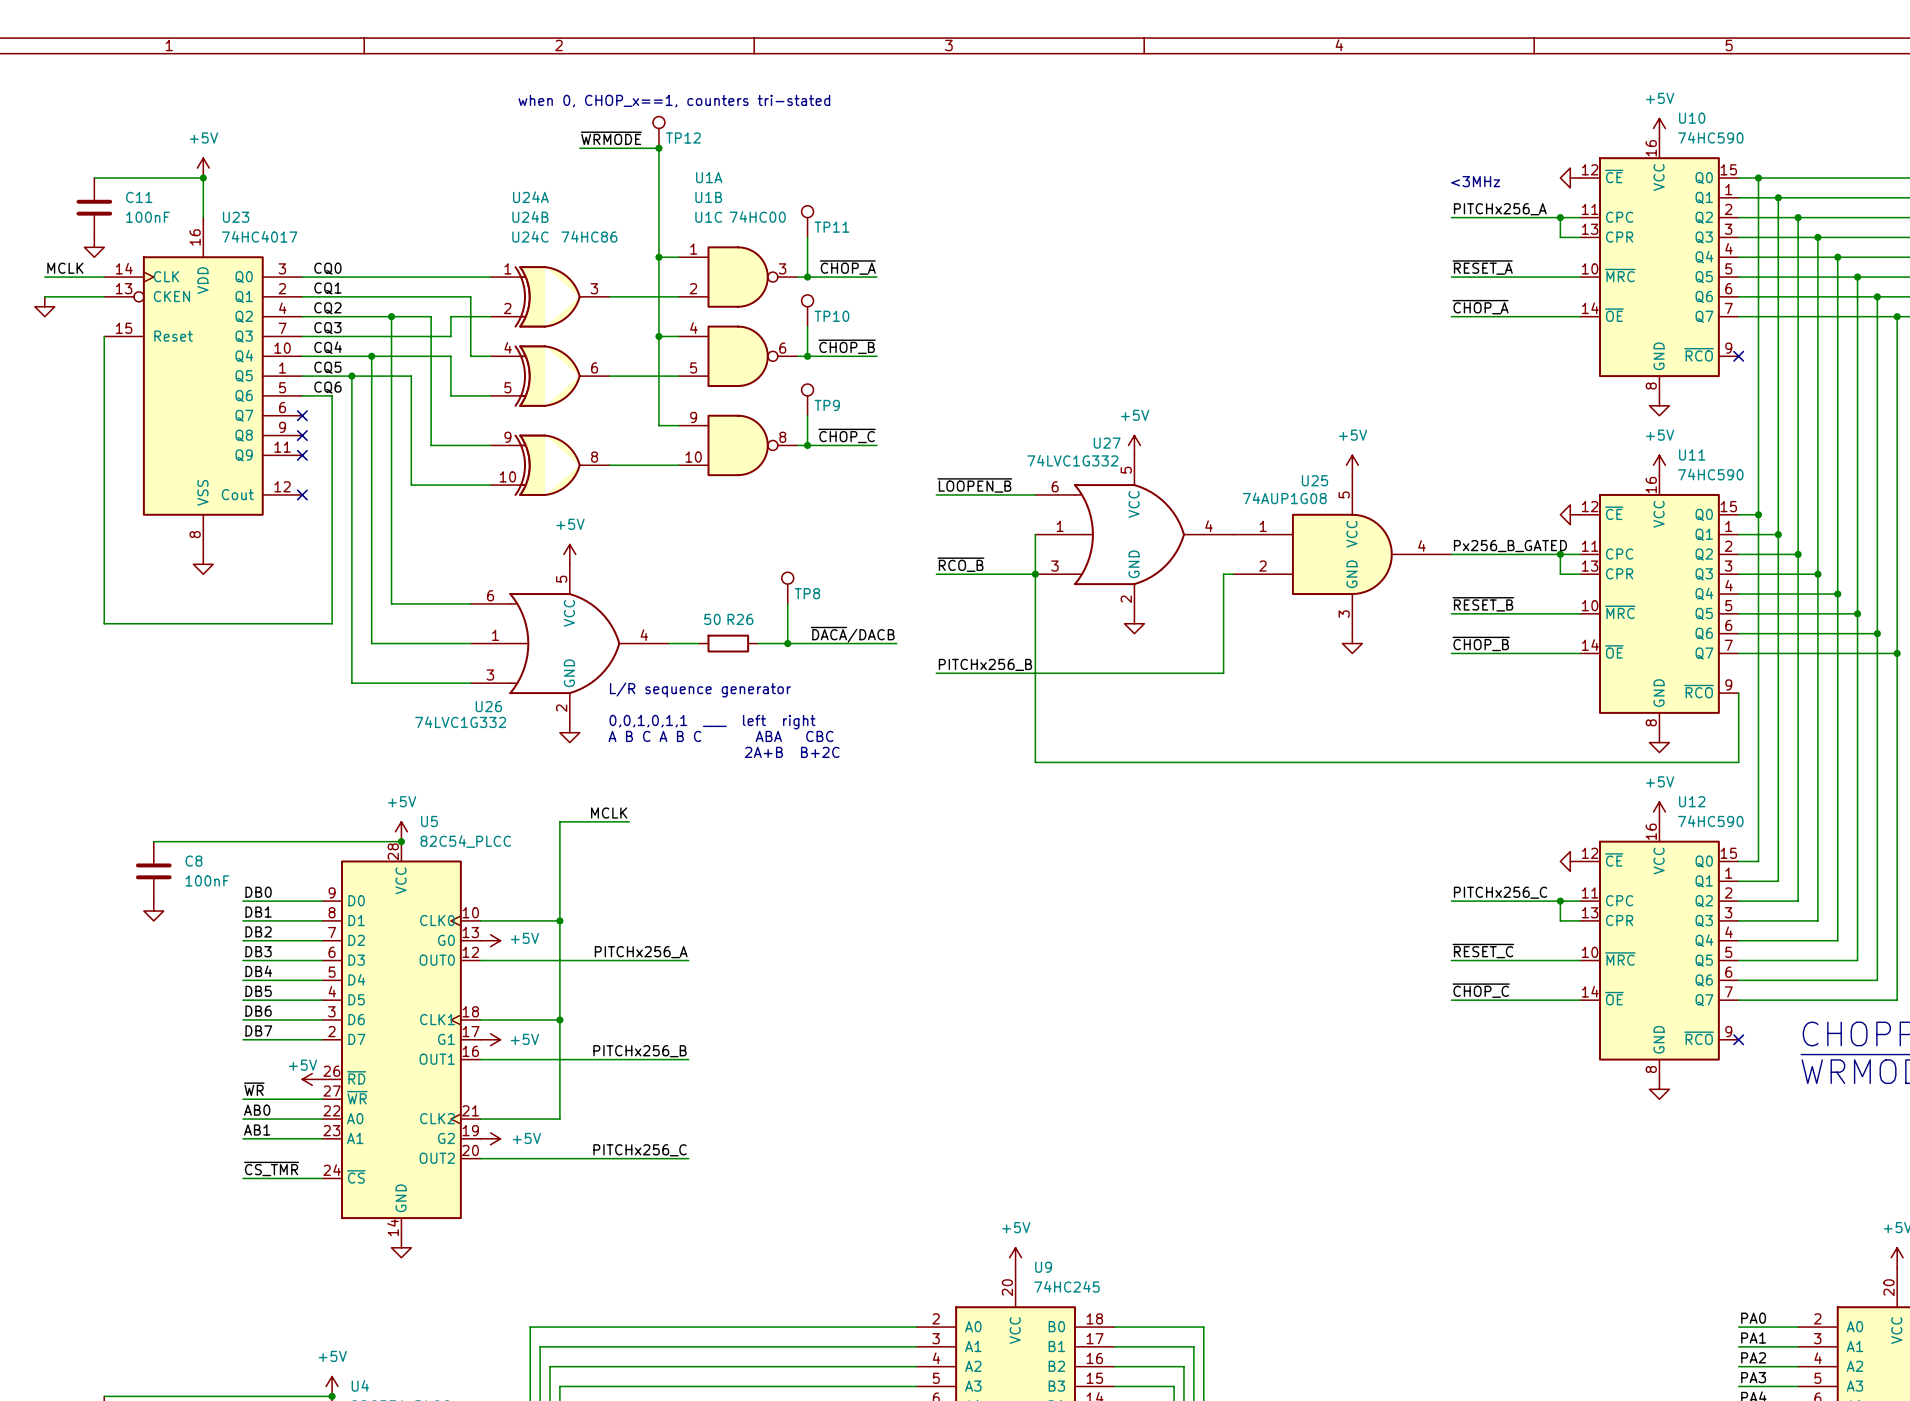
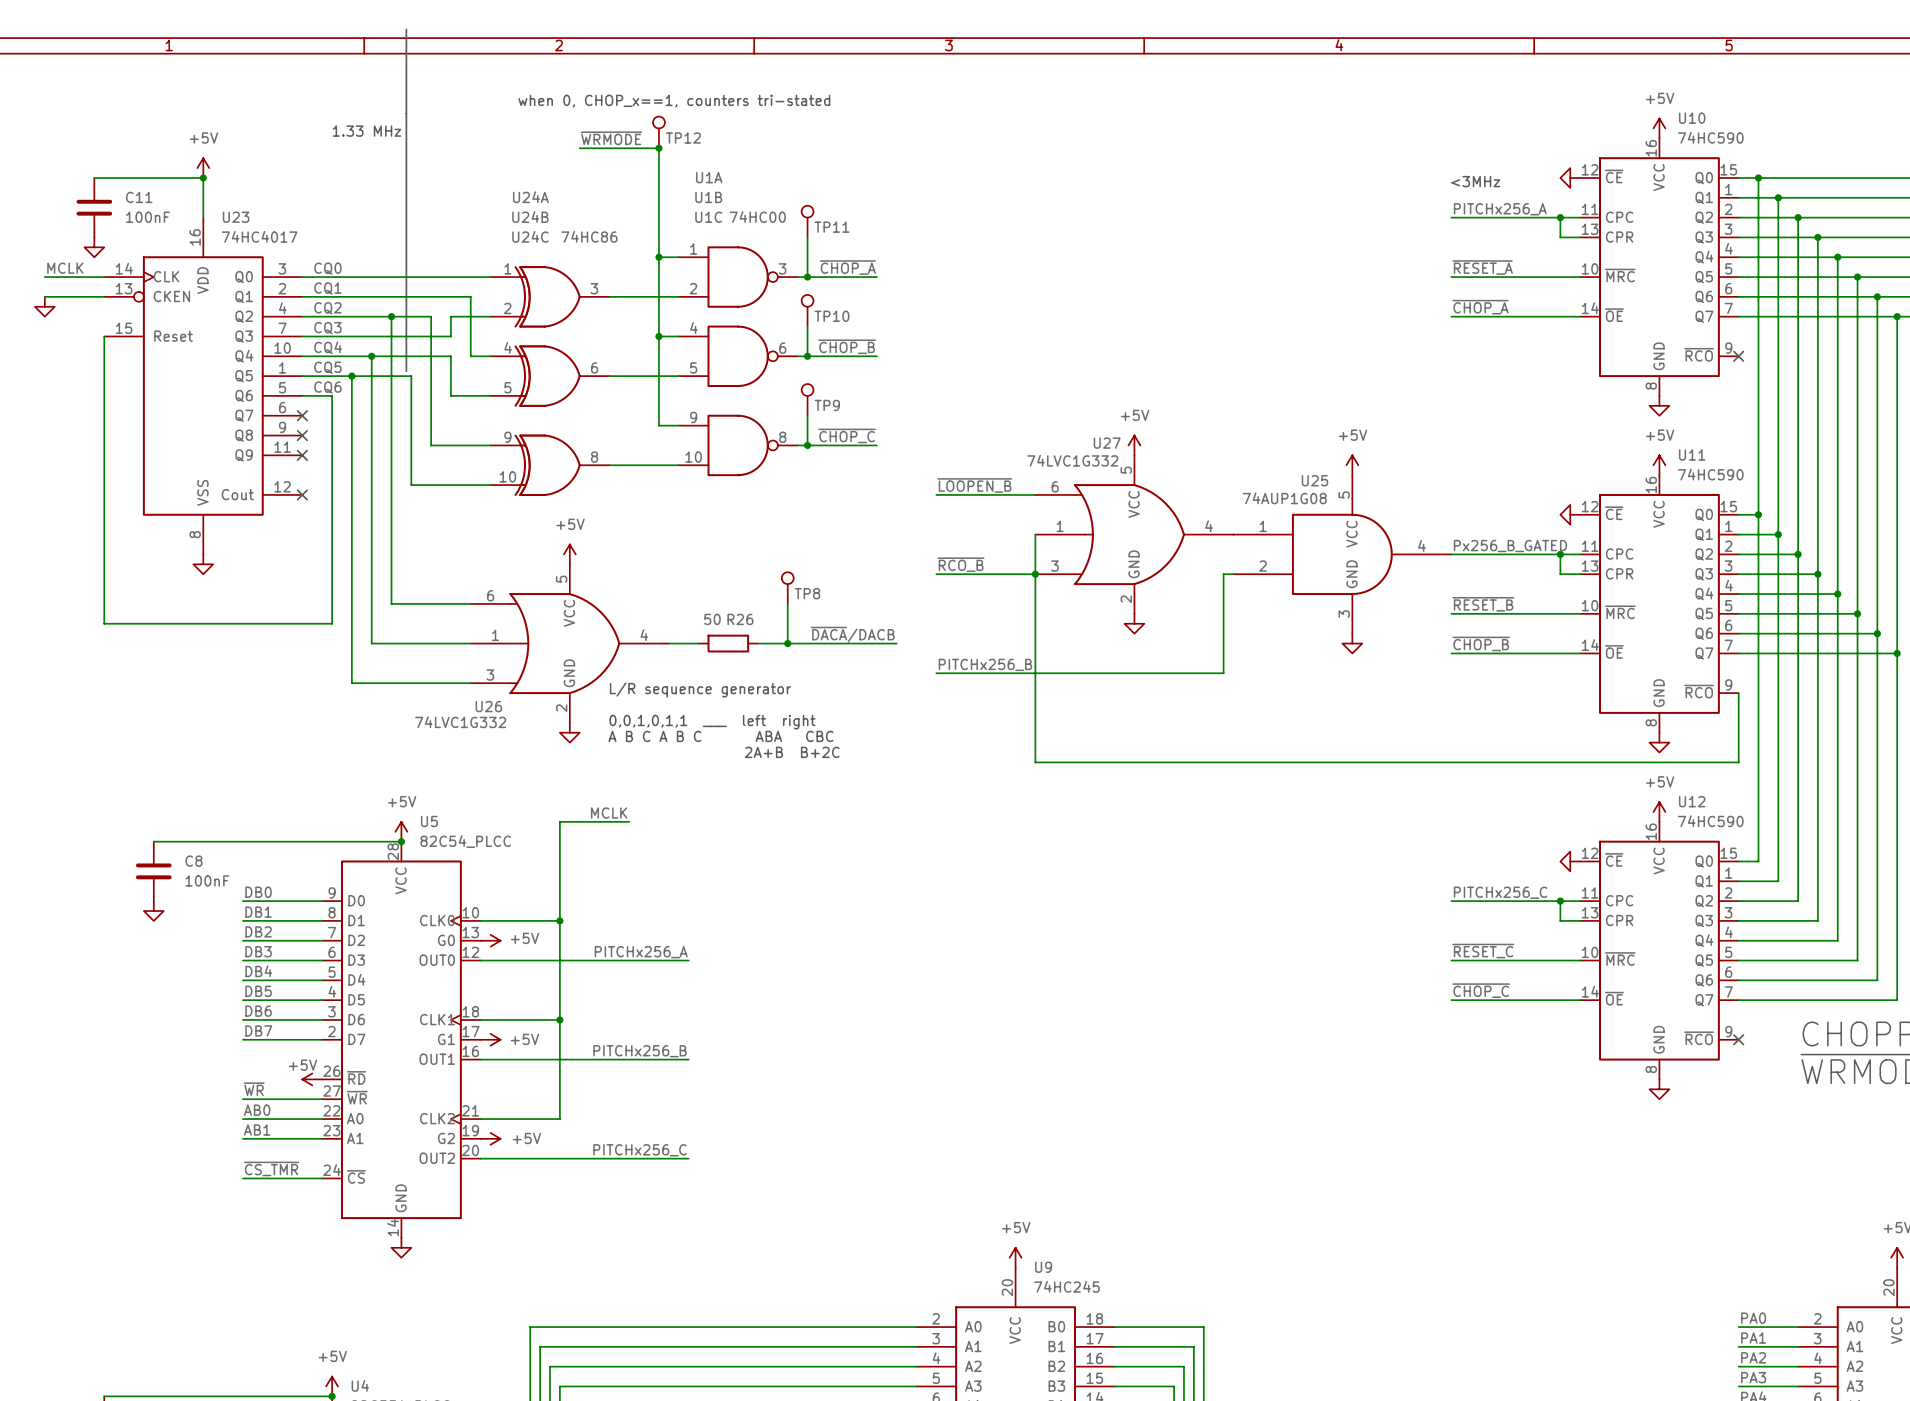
line: none -> (406, 29) (406, 371)
text: none -> 1.33 MHz (366, 131)

